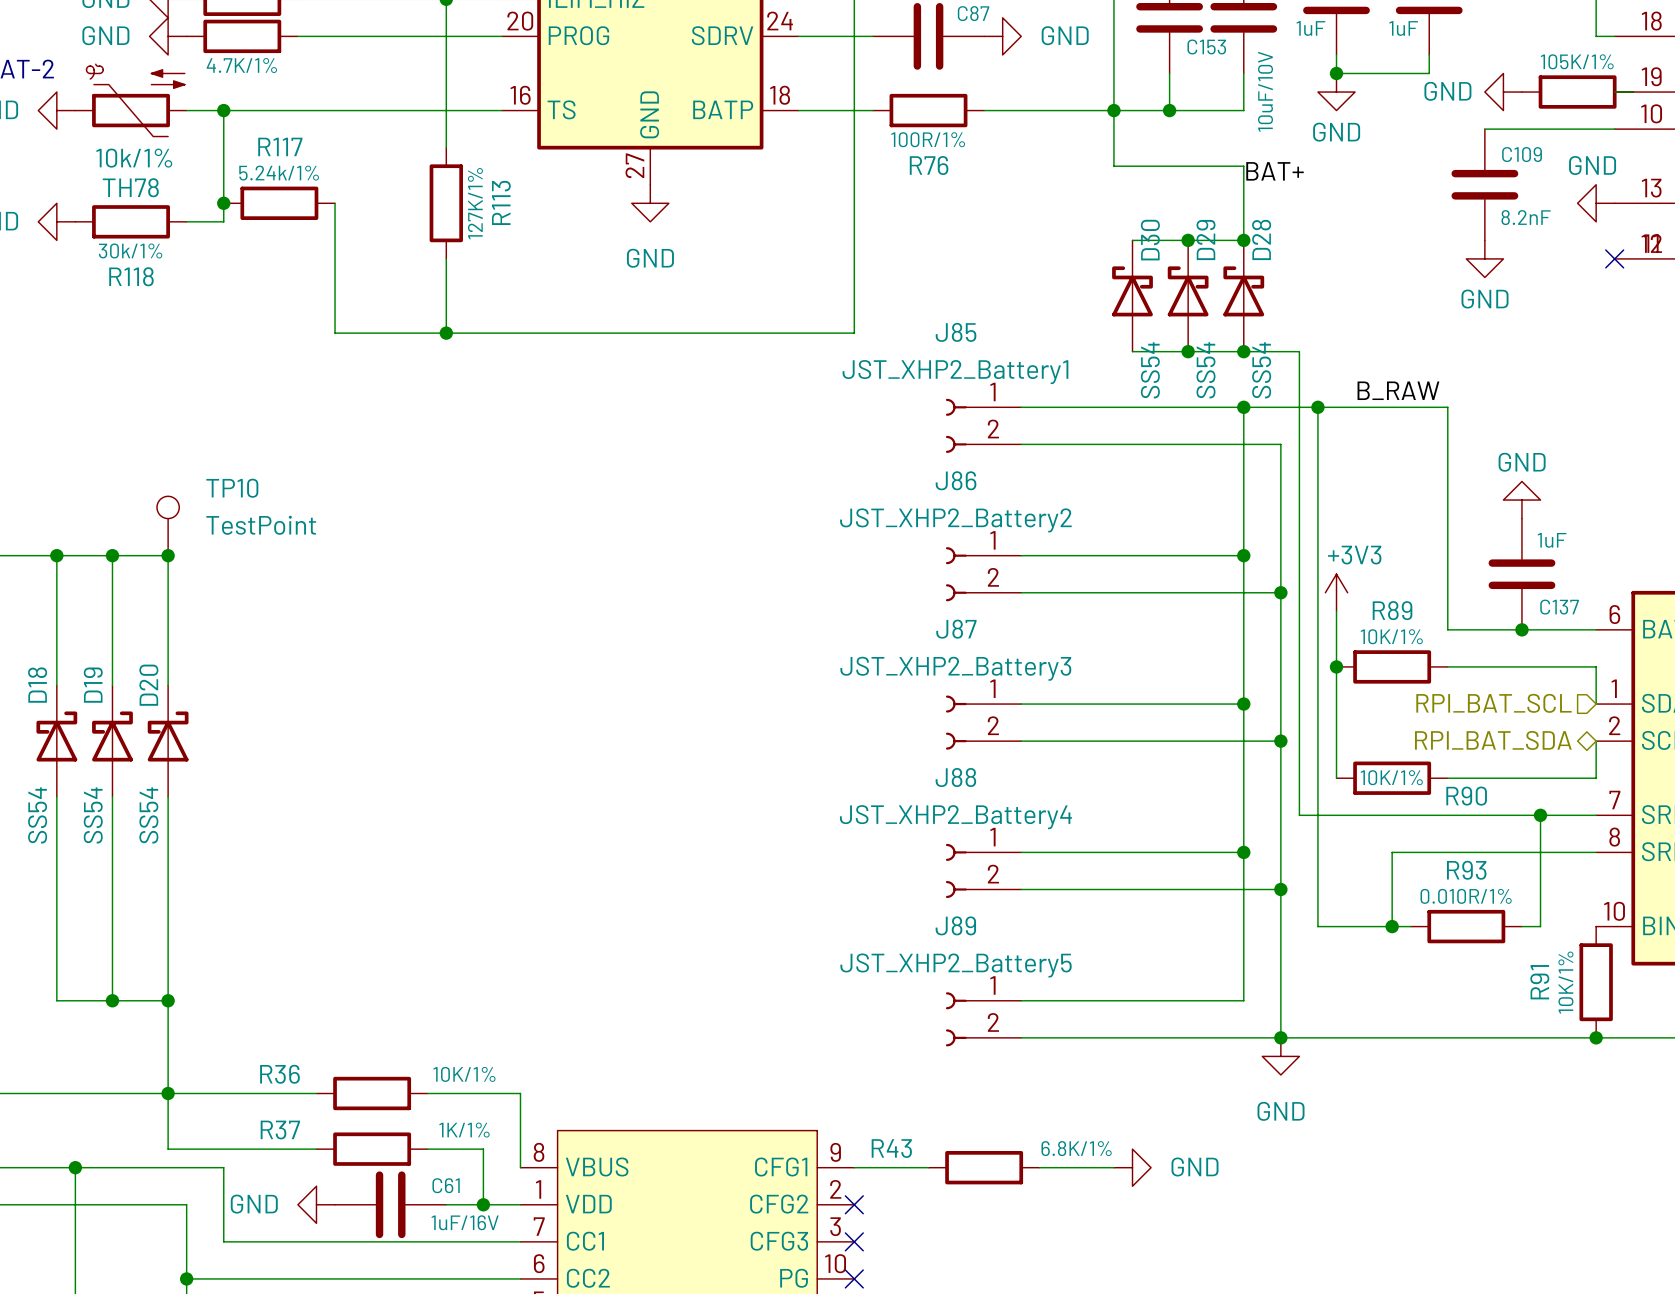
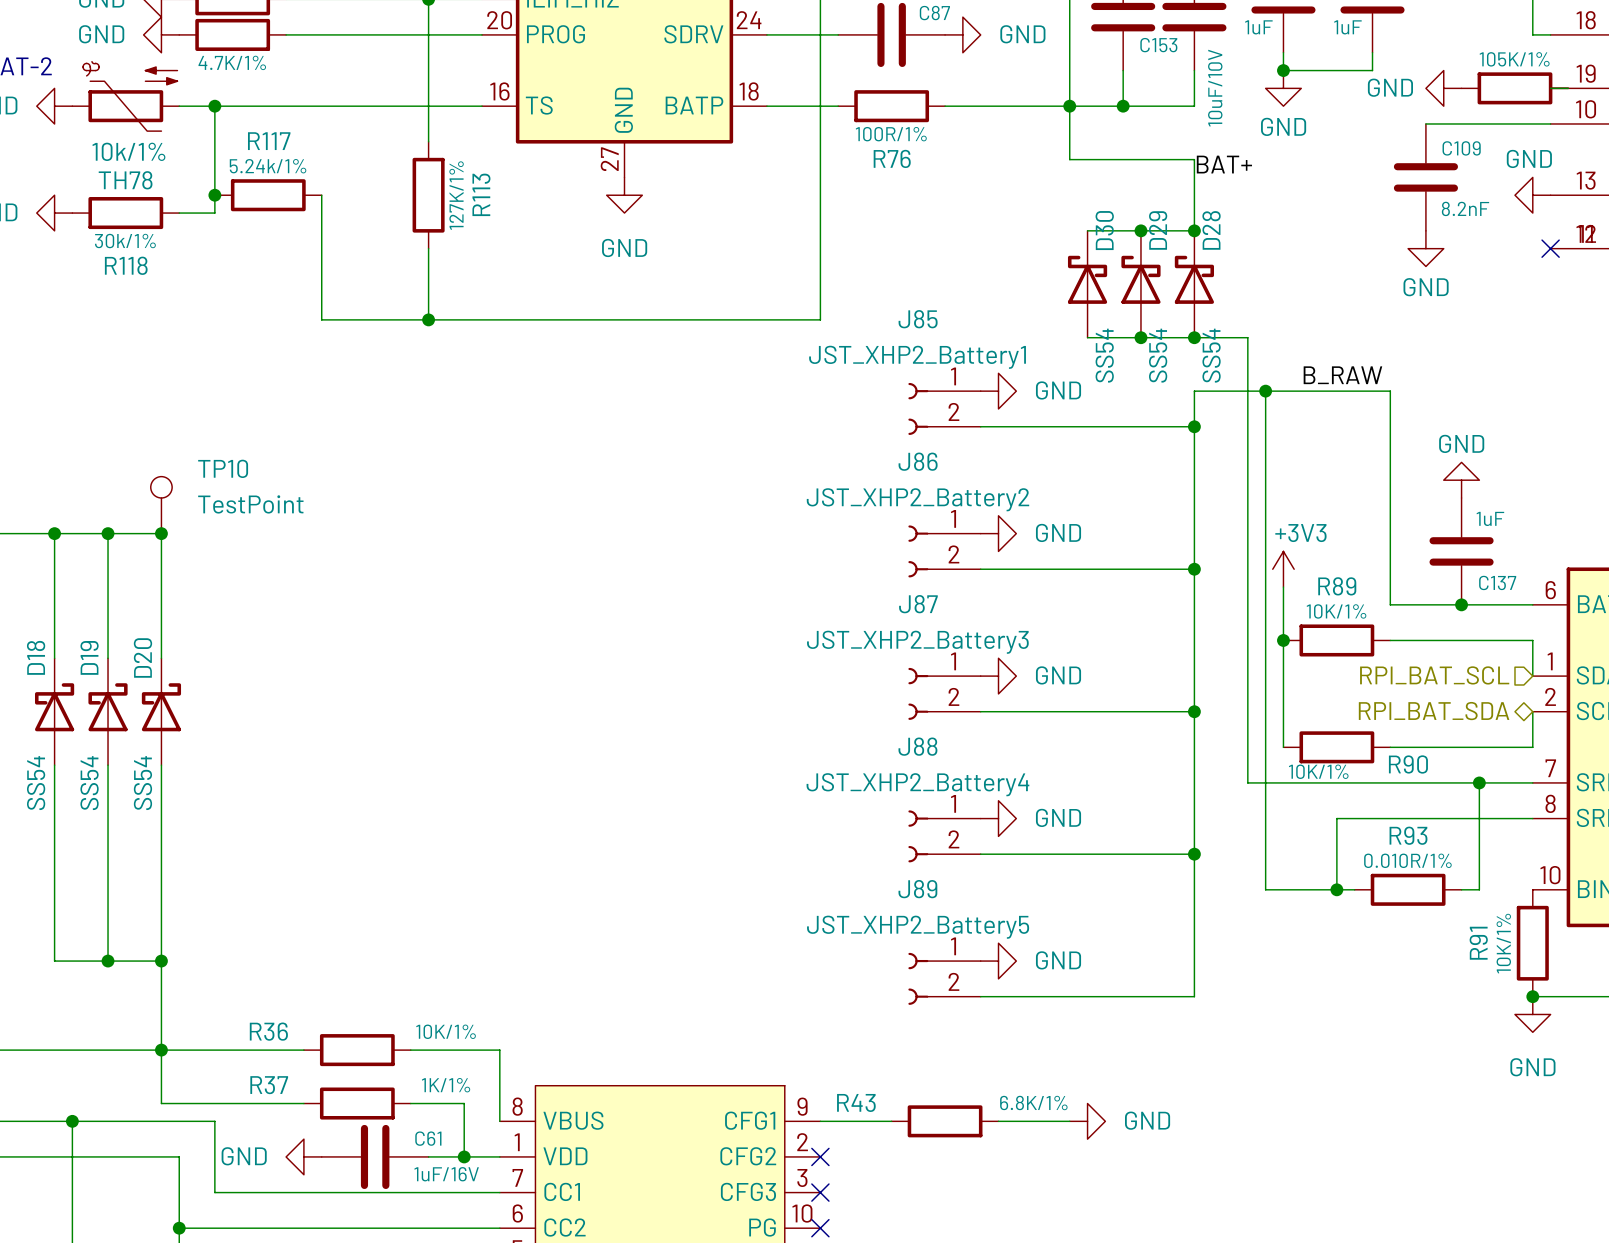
wire: (1021, 407) (1243, 407) -> none
power symbol: none -> GND (998, 391)
junction position: (1243, 407) -> (1194, 426)
wire: (1243, 444) (1280, 444) (1280, 1037) -> none
wire: (1021, 555) (1243, 555) -> none
power symbol: none -> GND (998, 533)
junction: (1243, 555) -> none
wire: (1243, 592) (1280, 592) -> none
junction: none -> (1194, 569)
junction: (1280, 592) -> none
wire: (1021, 704) (1243, 704) -> none
power symbol: none -> GND (998, 676)
junction: (1243, 704) -> none
wire: (1243, 741) (1280, 741) -> none
junction: none -> (1194, 711)
junction: (1280, 741) -> none
R90 value position: 10K/1% (1391, 777) -> 10K/1% (1318, 771)
wire: (1021, 852) (1243, 852) -> none
power symbol: none -> GND (998, 818)
junction: (1243, 852) -> none
wire: (1243, 889) (1280, 889) -> none
junction: none -> (1194, 854)
junction: (1280, 889) -> none
wire: (1021, 1000) (1243, 1000) -> (1194, 996) (1194, 961)
power symbol: none -> GND (998, 961)
wire: (1243, 1037) (1596, 1037) -> none
junction: (1280, 1037) -> none
power symbol: GND (1280, 1056) -> none
power symbol: none -> GND (1532, 1014)

